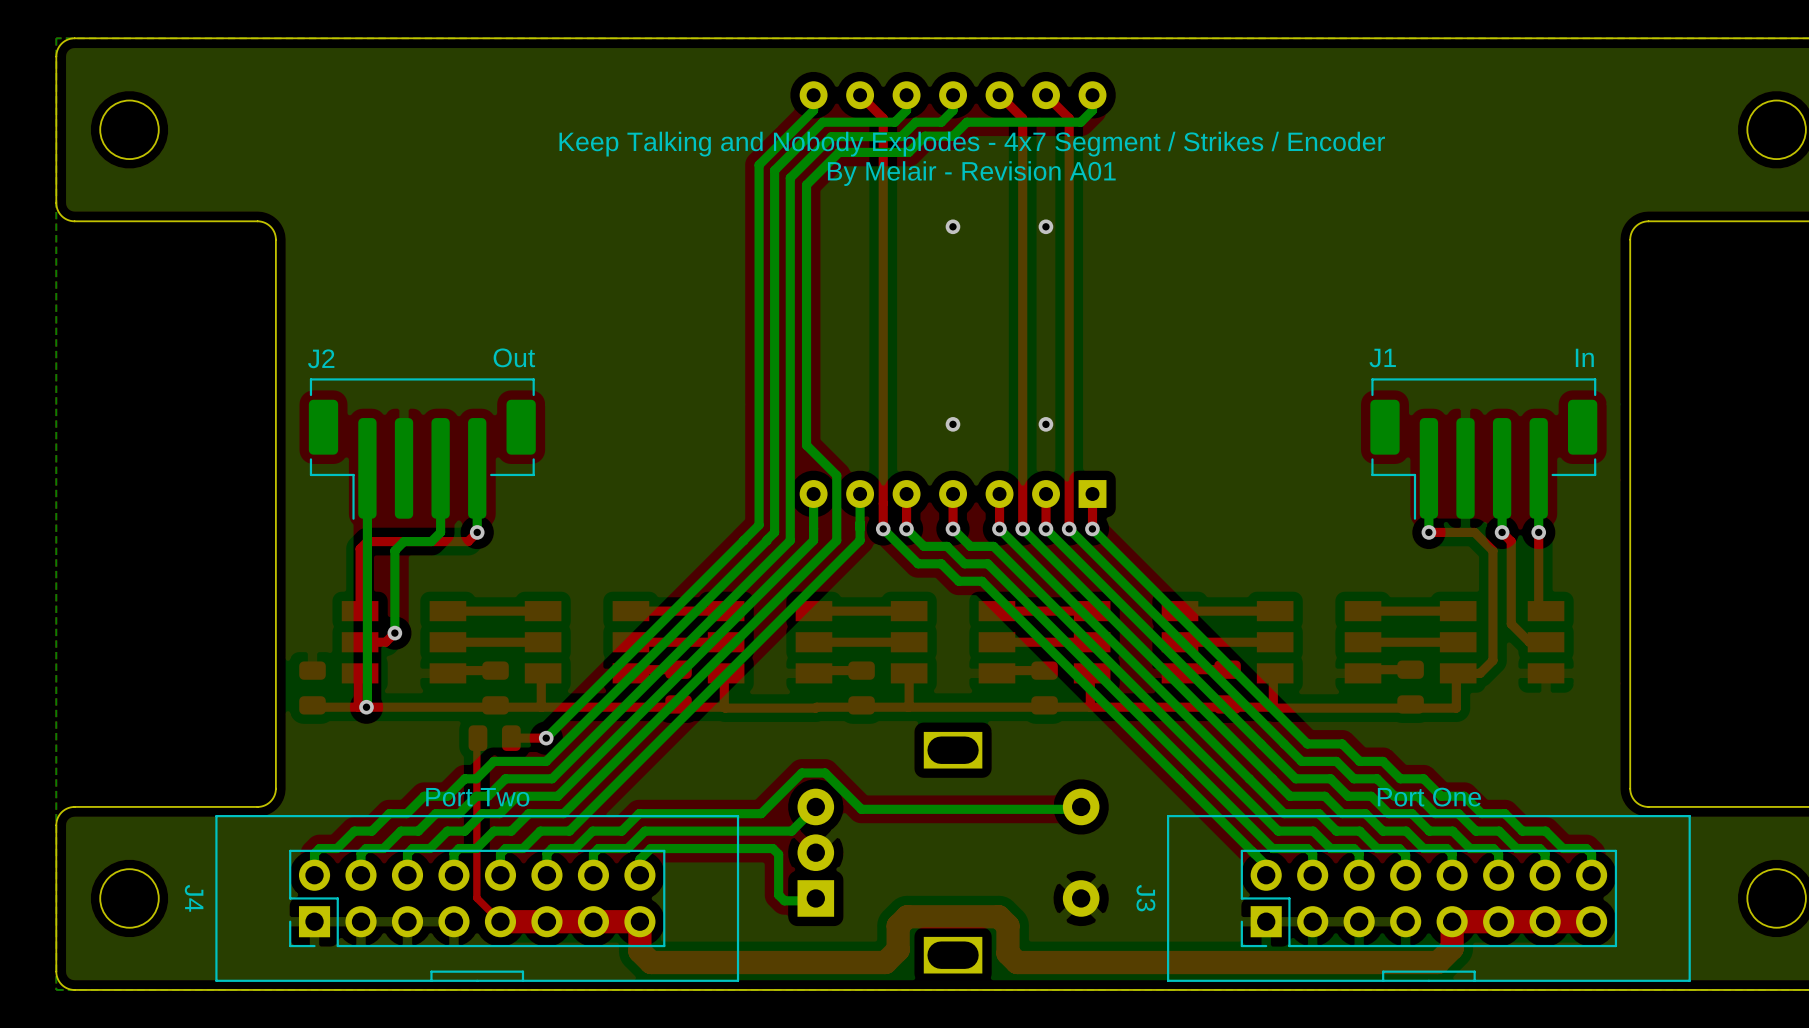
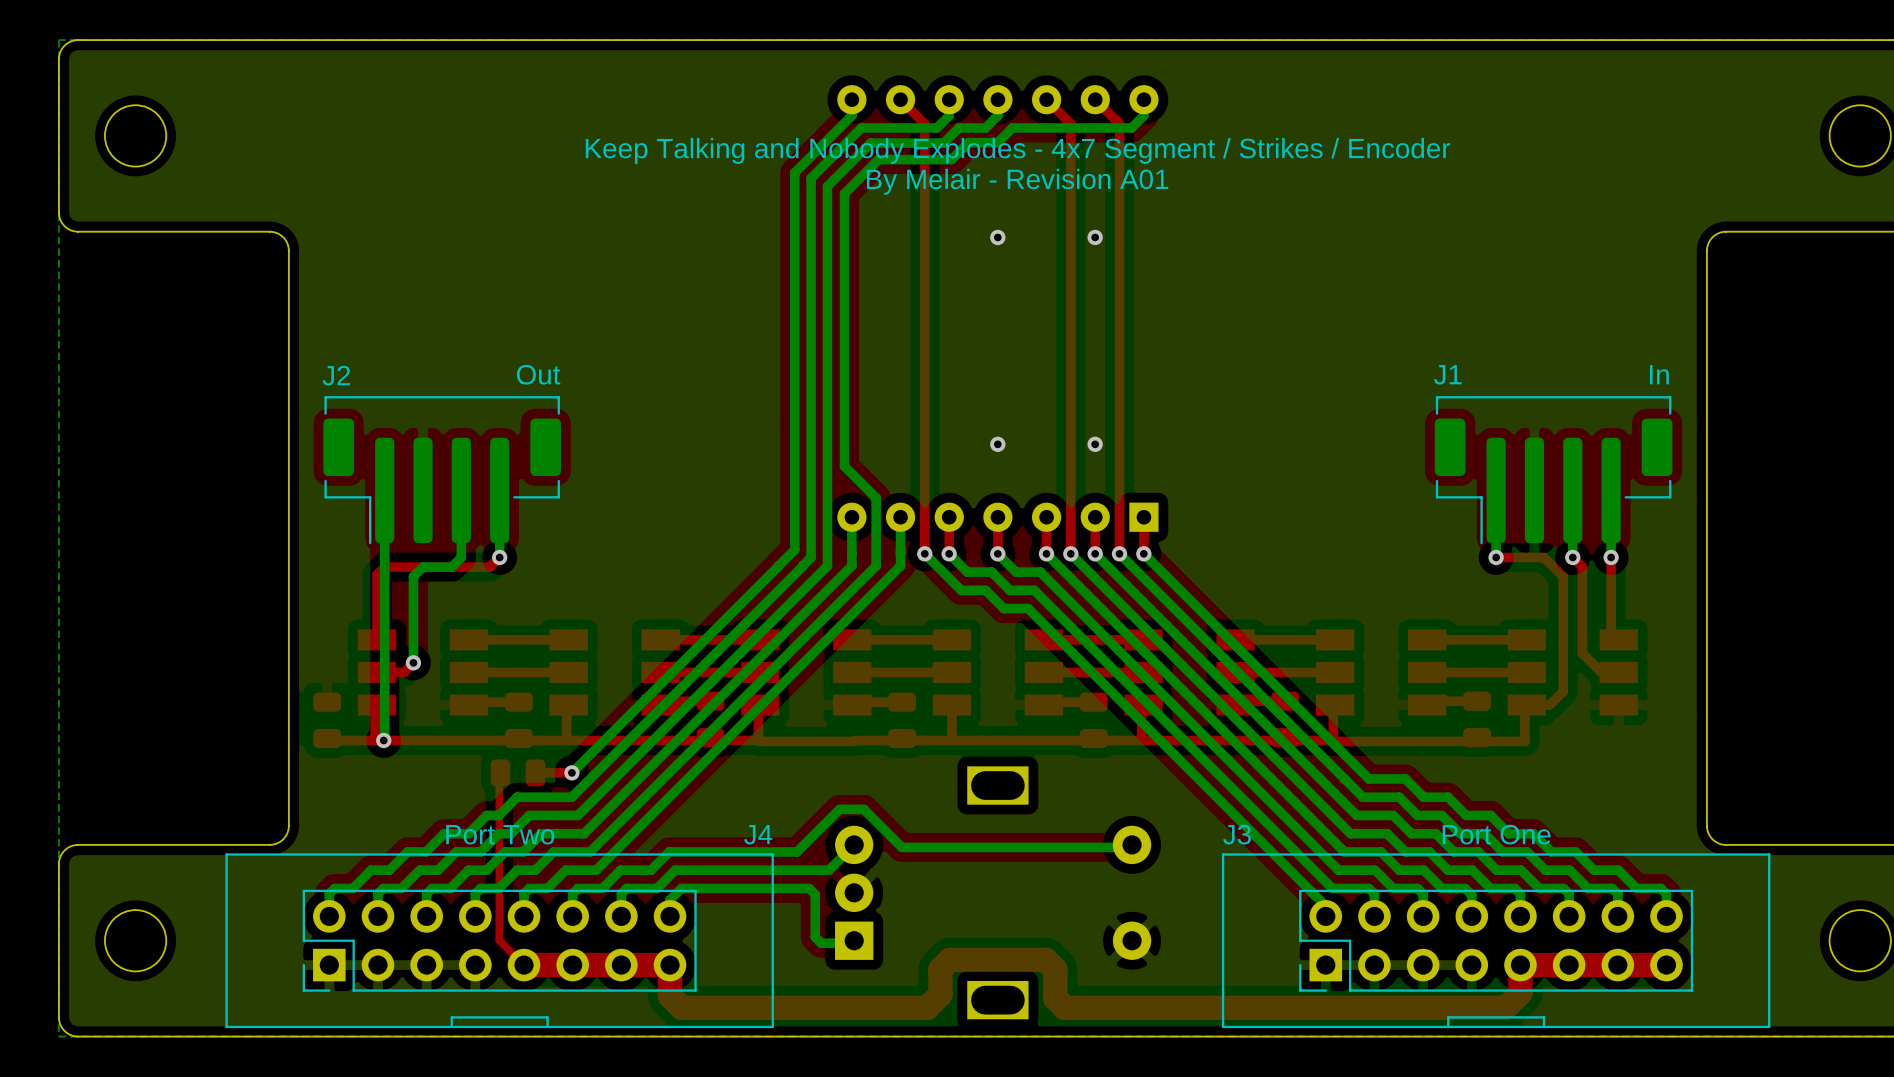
J4 name rotation: 0° (194, 898) -> 90° counterclockwise (758, 834)
J4 name position: J4 (194, 898) -> J4 (758, 834)
J3 name rotation: 0° (1145, 898) -> 90° counterclockwise (1237, 834)
J3 name position: J3 (1145, 898) -> J3 (1237, 834)

